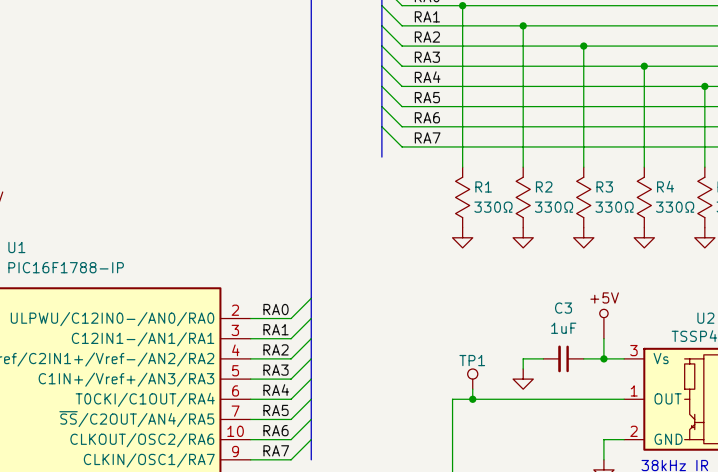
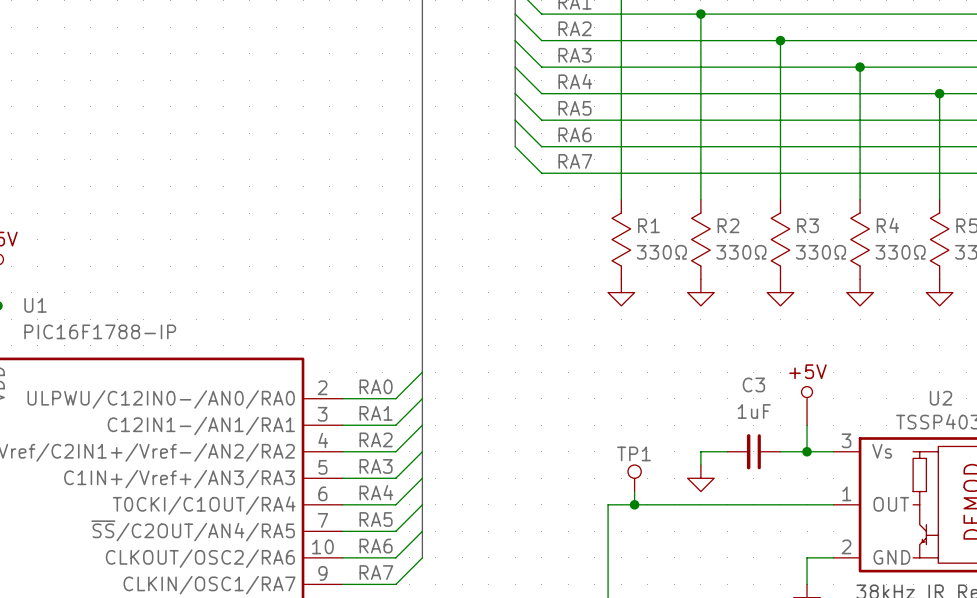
bus: (381, 126) (381, 157) -> none
bus: (311, 439) (311, 459) -> none

